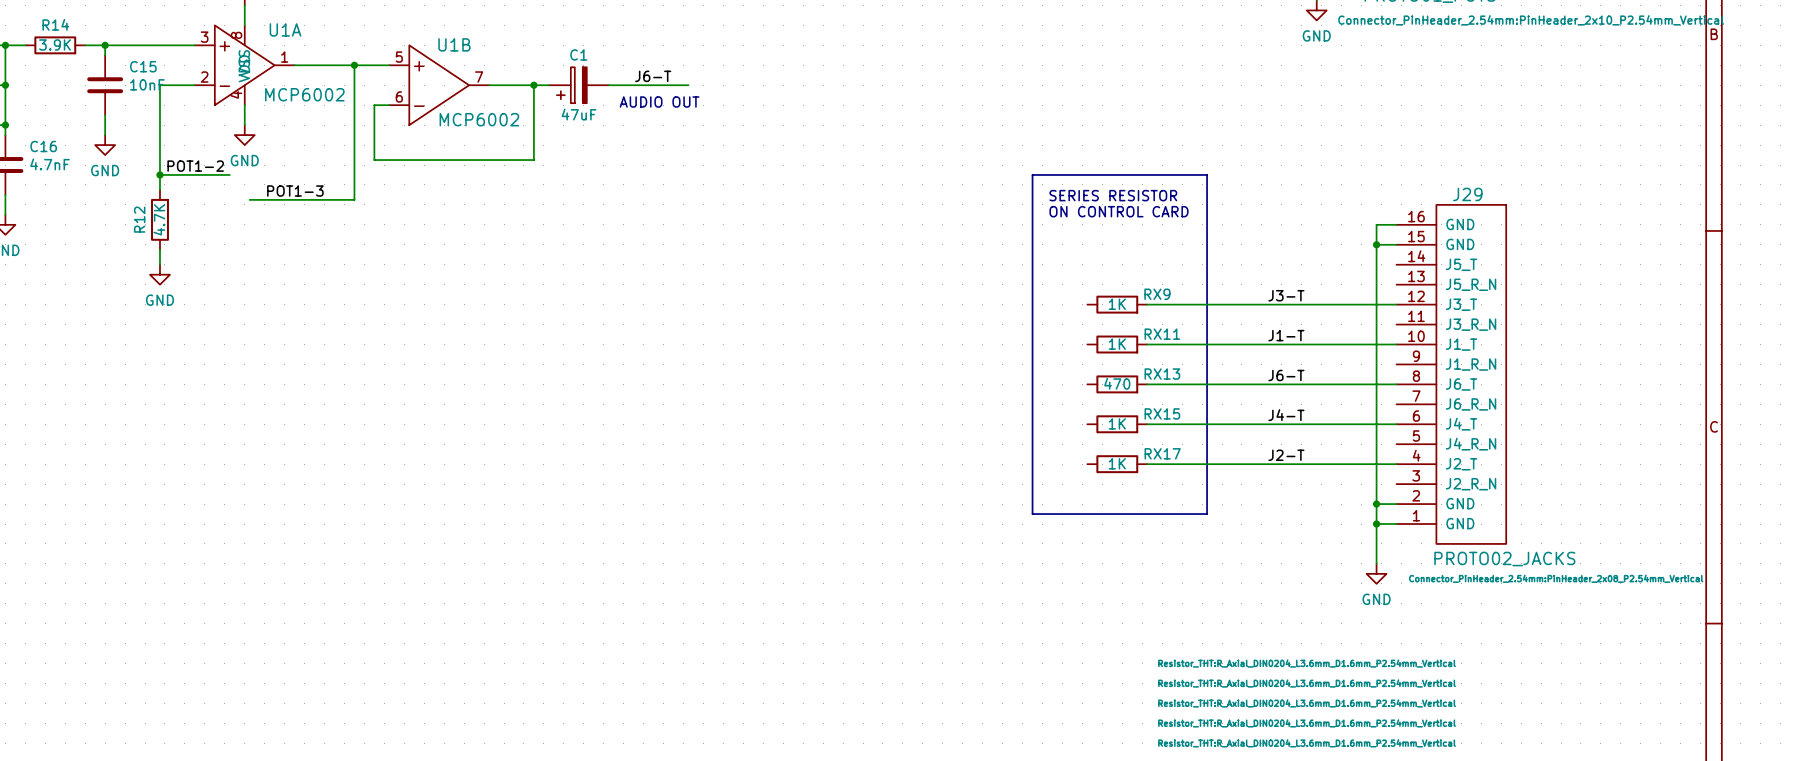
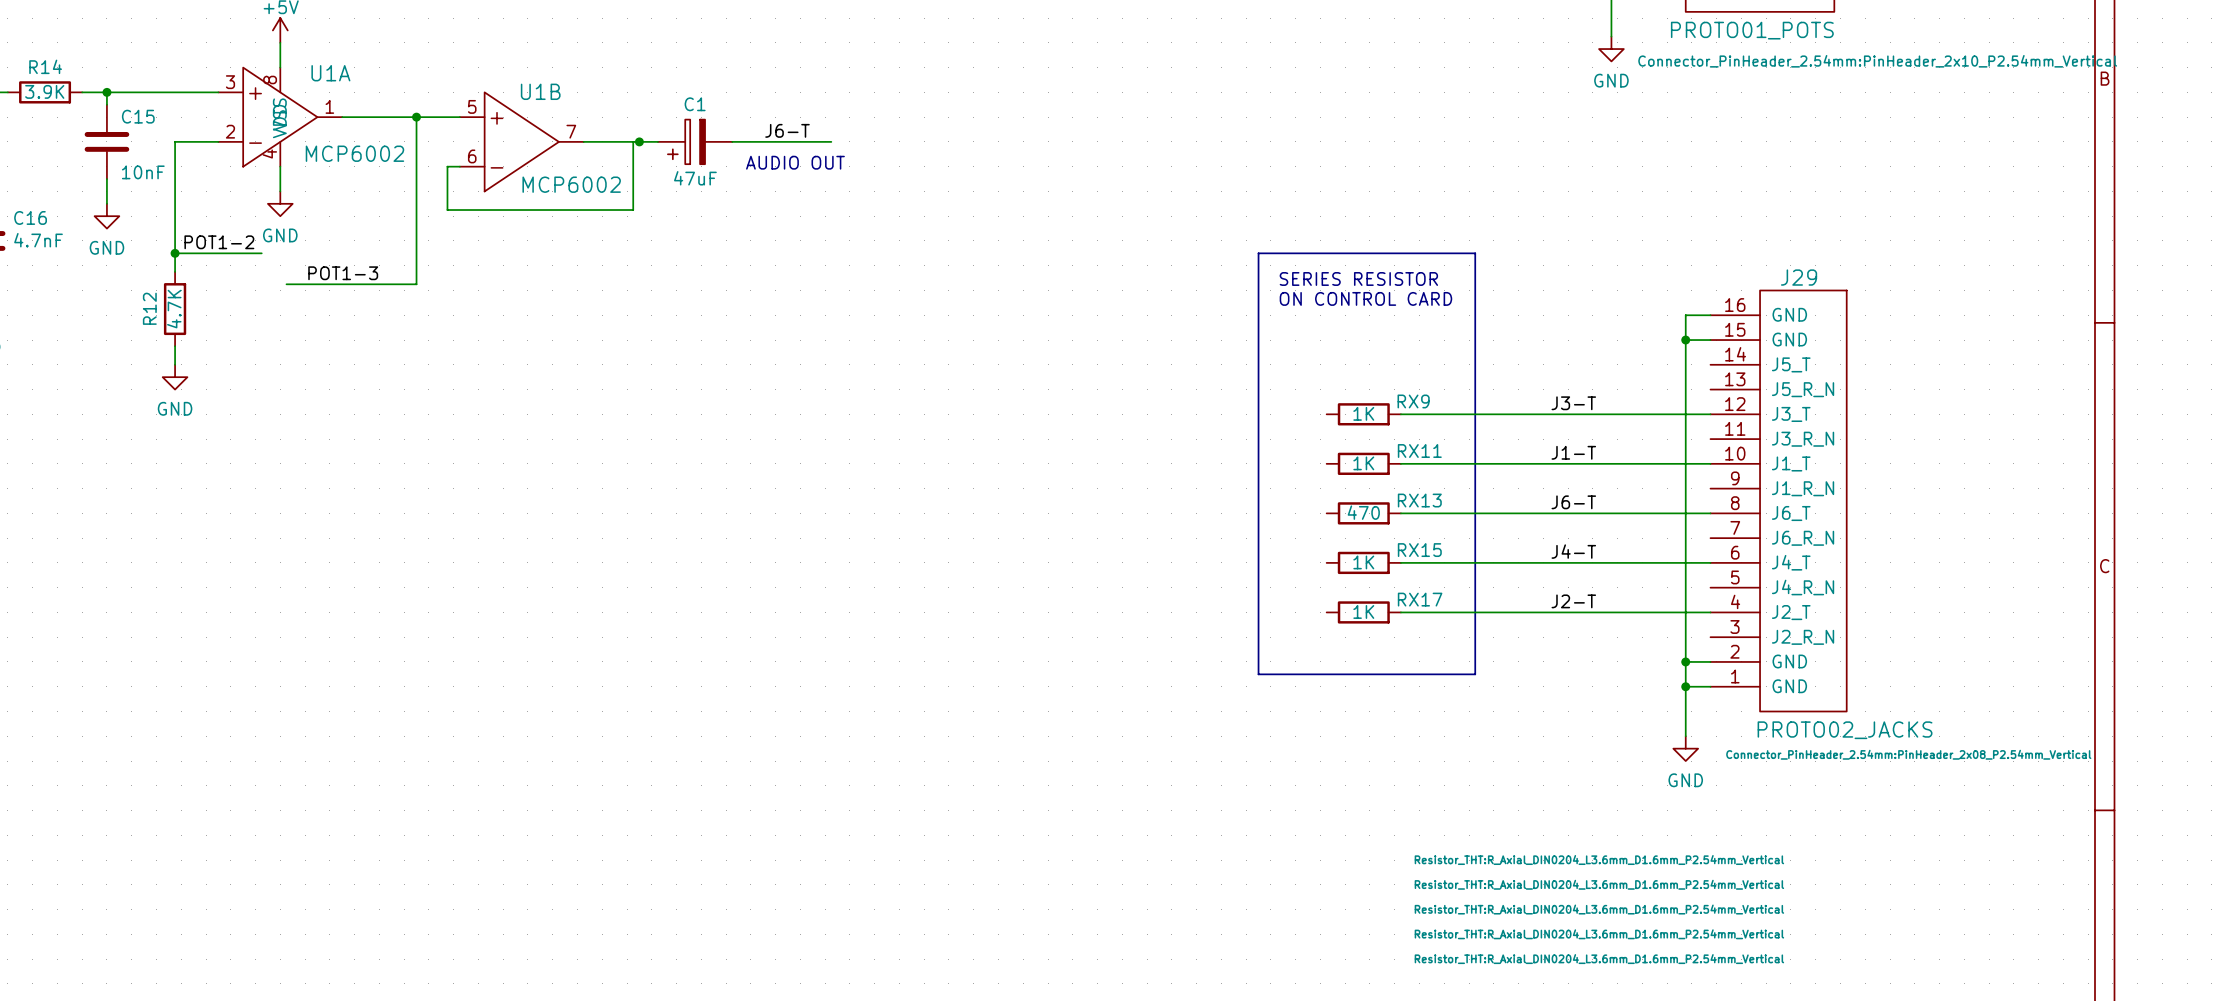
C15 name position: C15 (143, 66) -> C15 (138, 116)
C15 value position: 10nF (147, 84) -> 10nF (143, 172)
wire: (533, 85) (533, 160) (374, 160) (374, 105) (379, 105) -> (633, 141) (633, 210) (447, 210) (447, 166)

